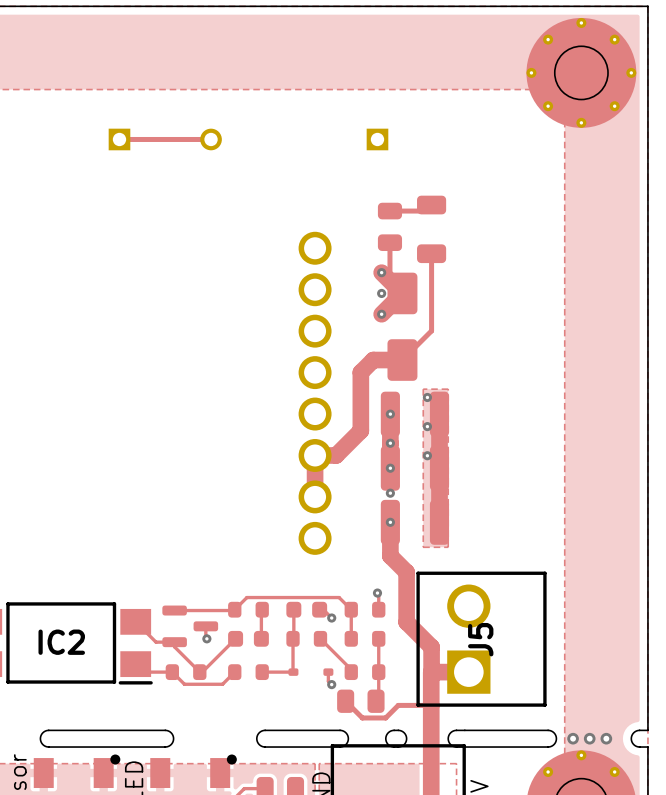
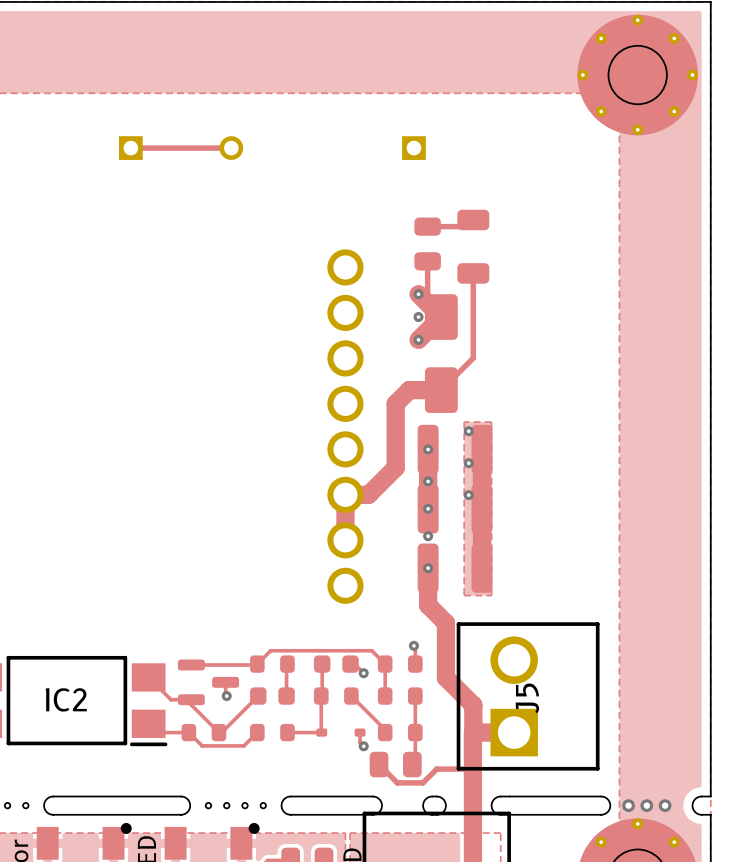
part: none -> (7, 805)
part: none -> (25, 805)
part: none -> (208, 805)
part: none -> (226, 805)
part: none -> (245, 805)
part: none -> (263, 805)

